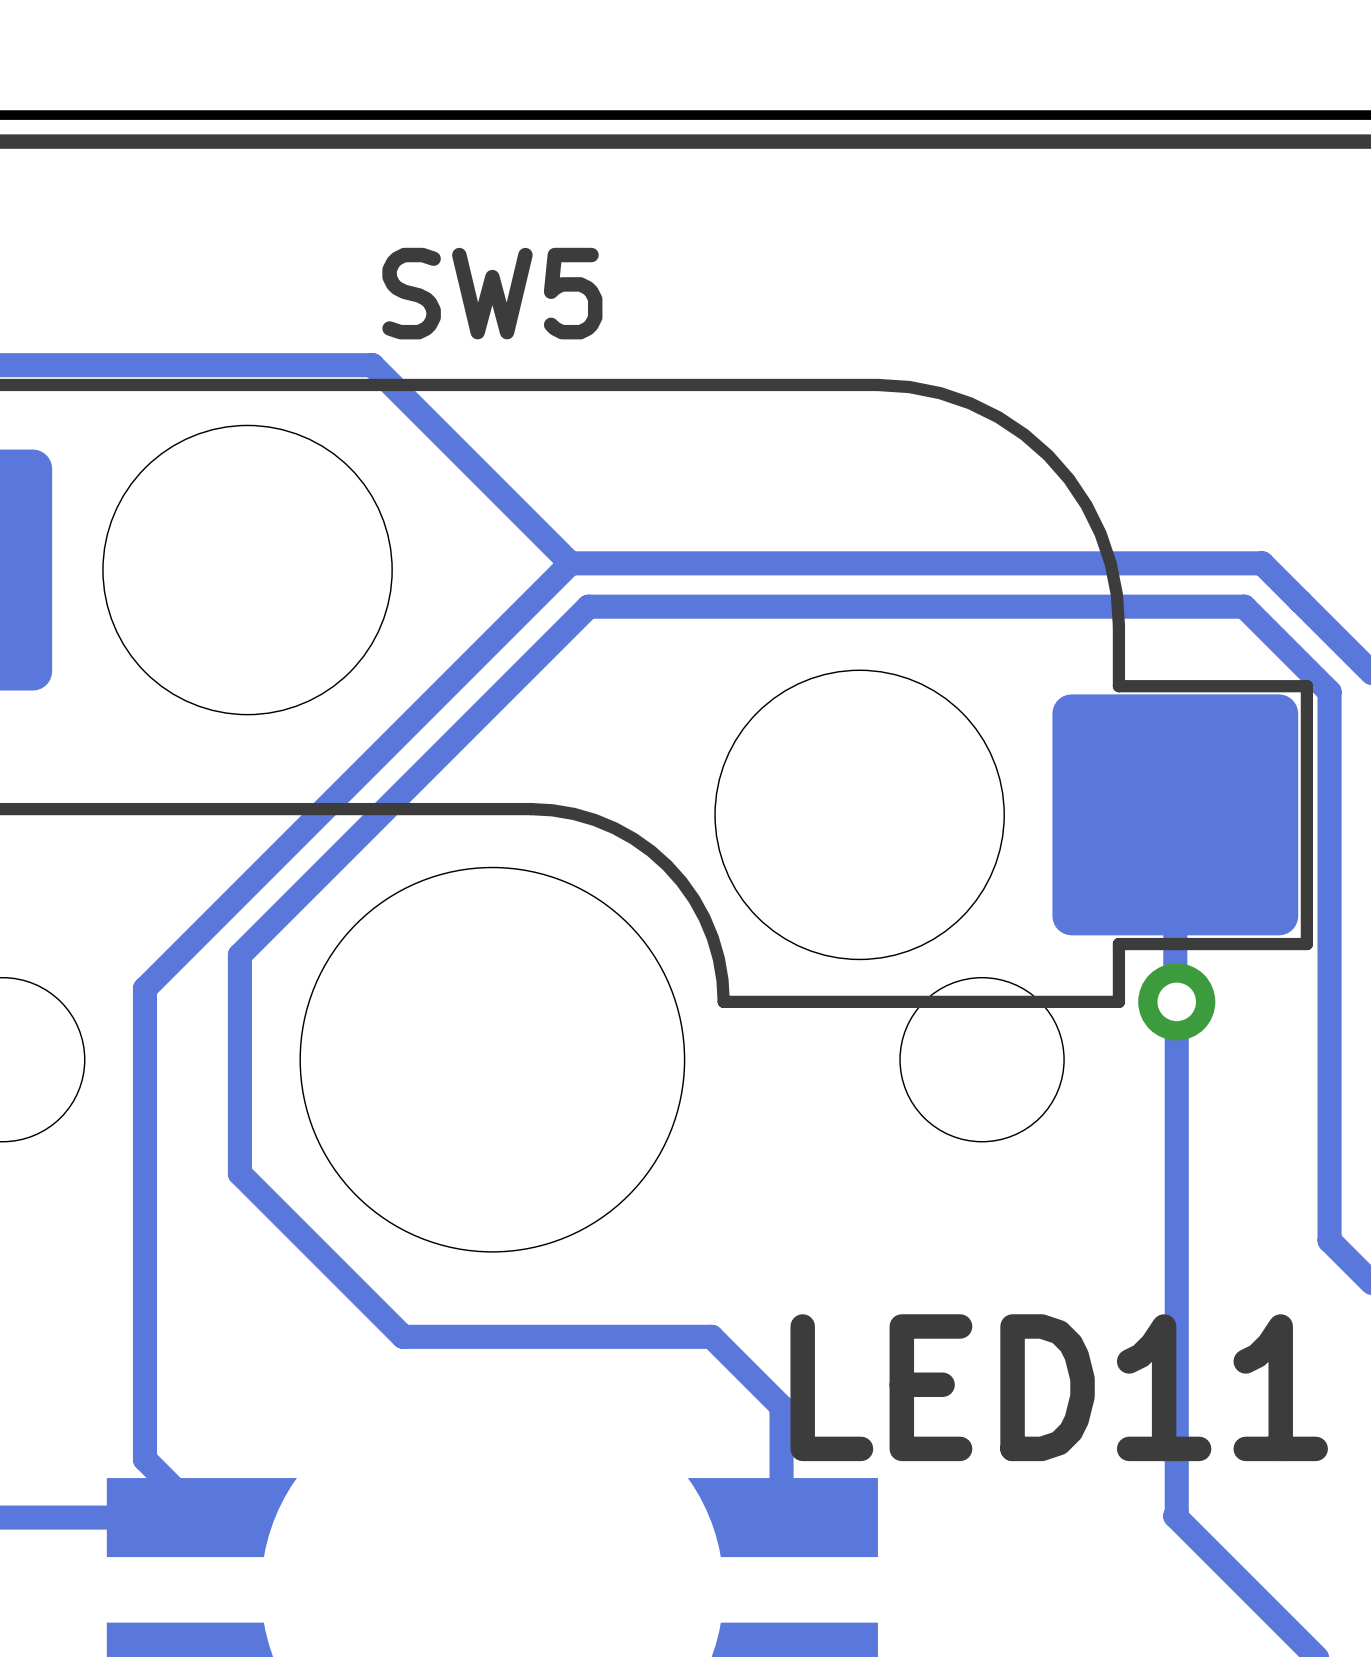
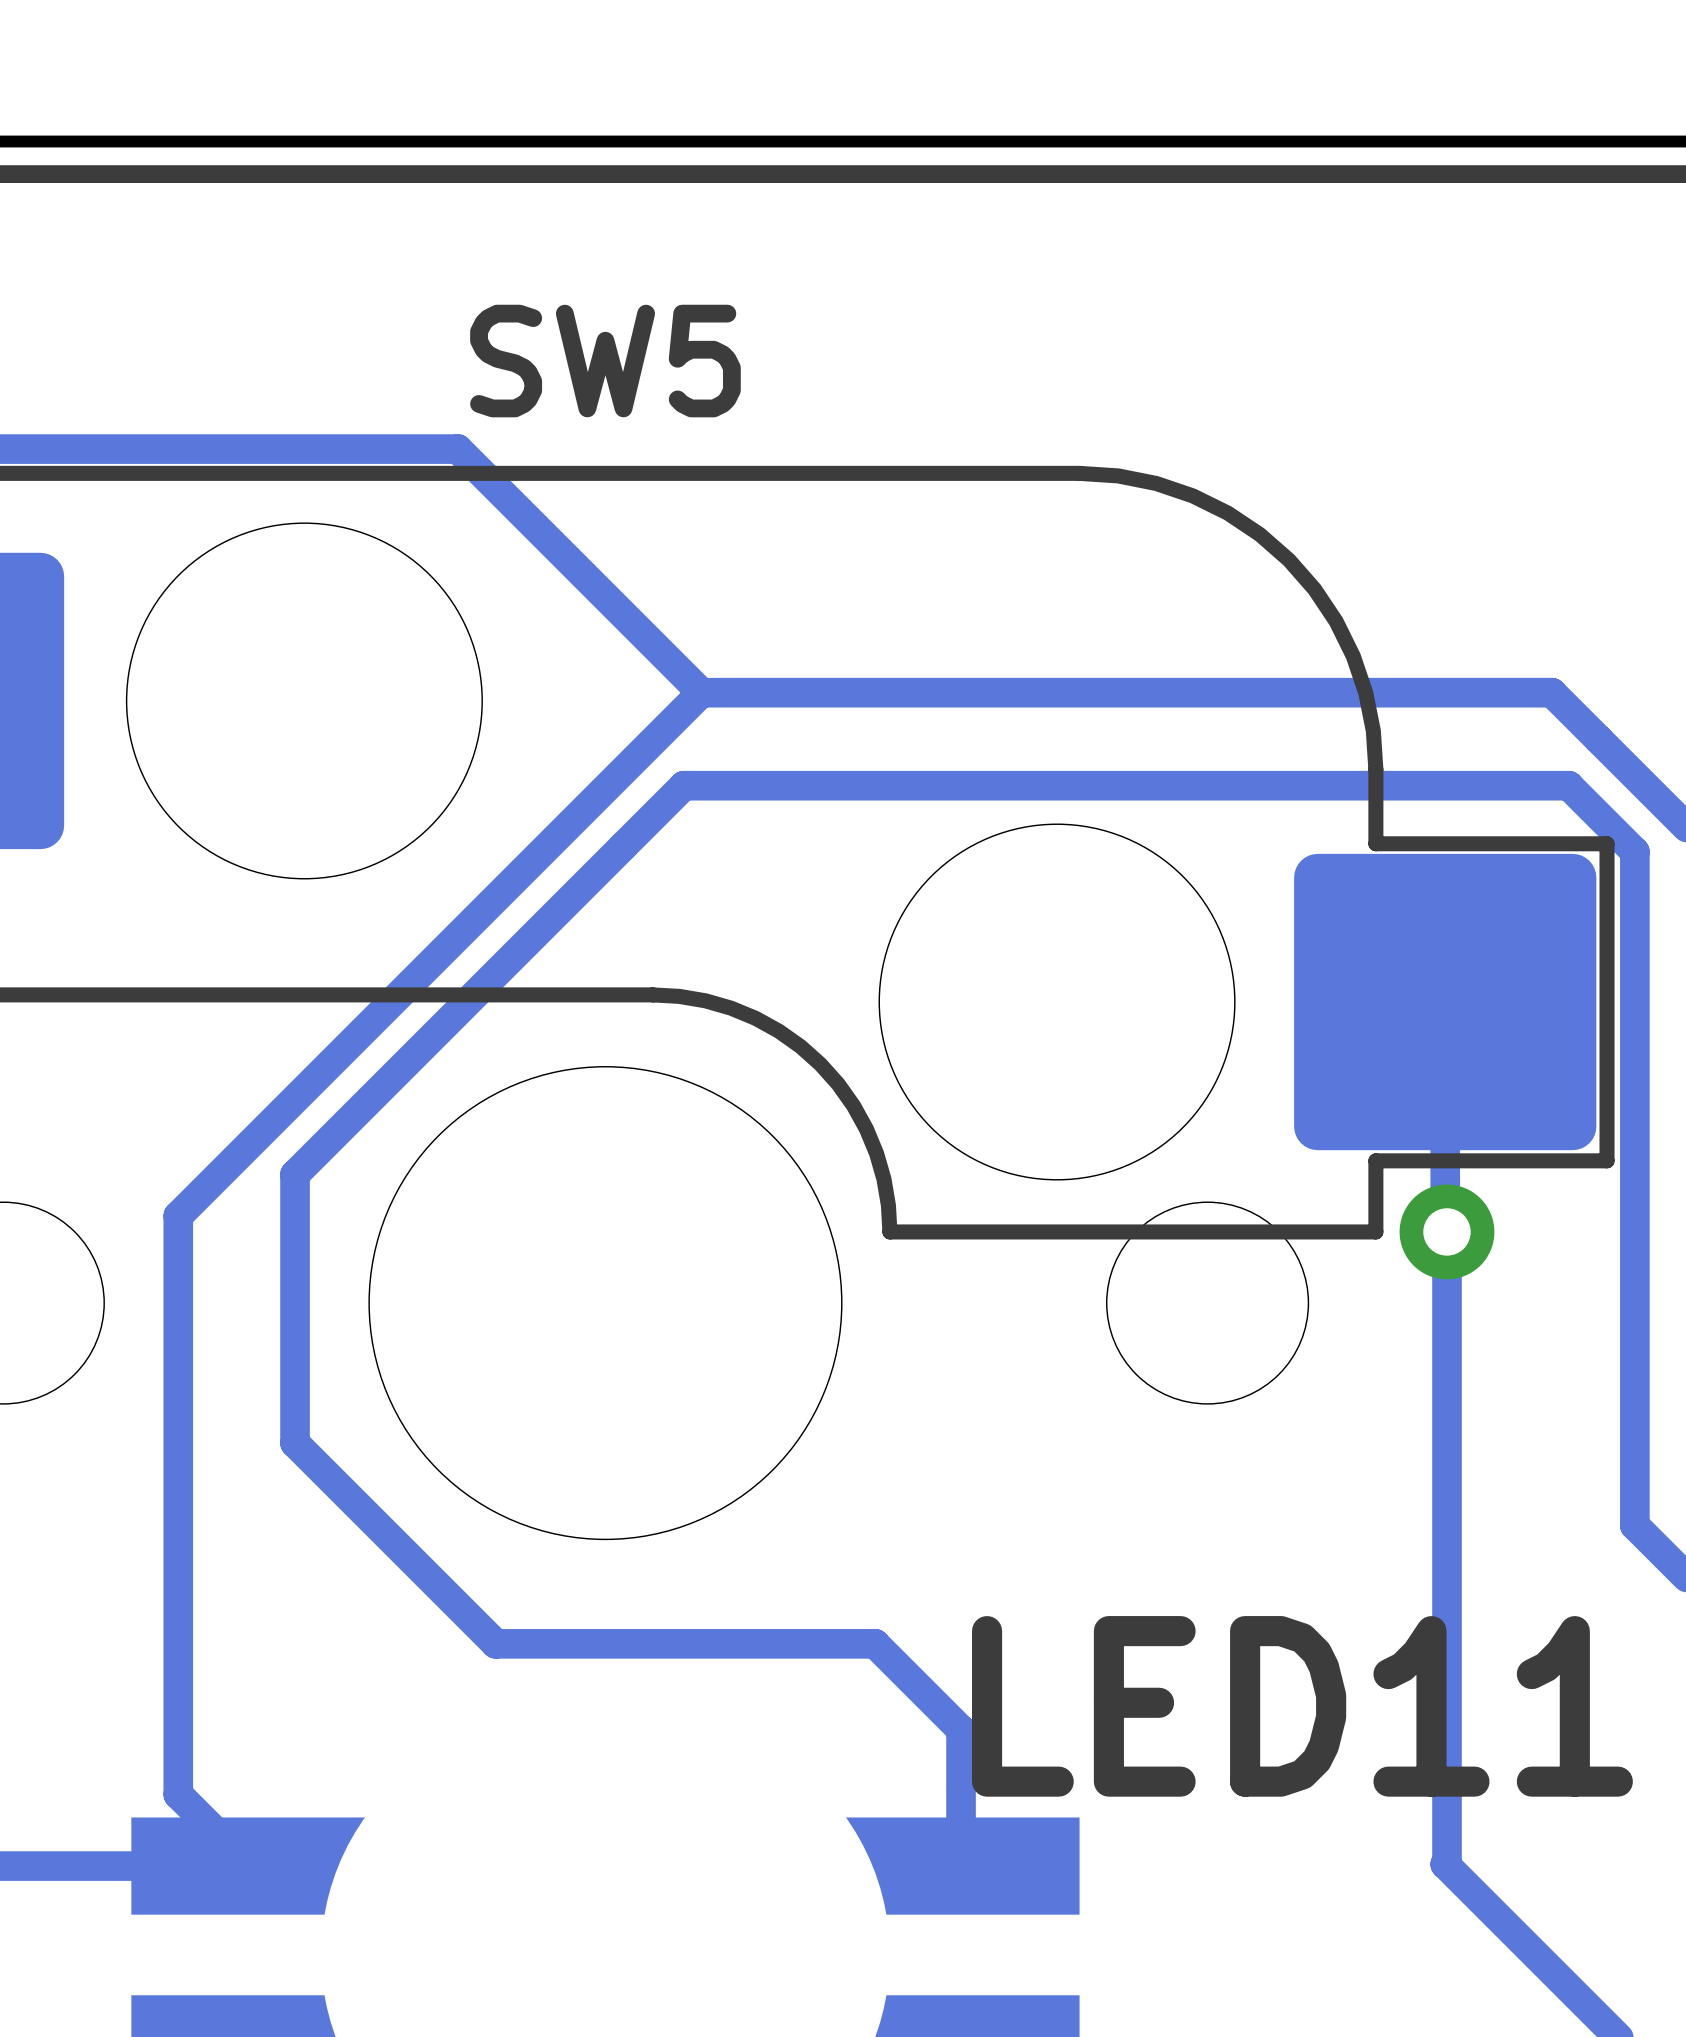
track: (1275, 638) (1244, 606) (588, 606) (506, 688) -> (1568, 785) (683, 785) (623, 846)

